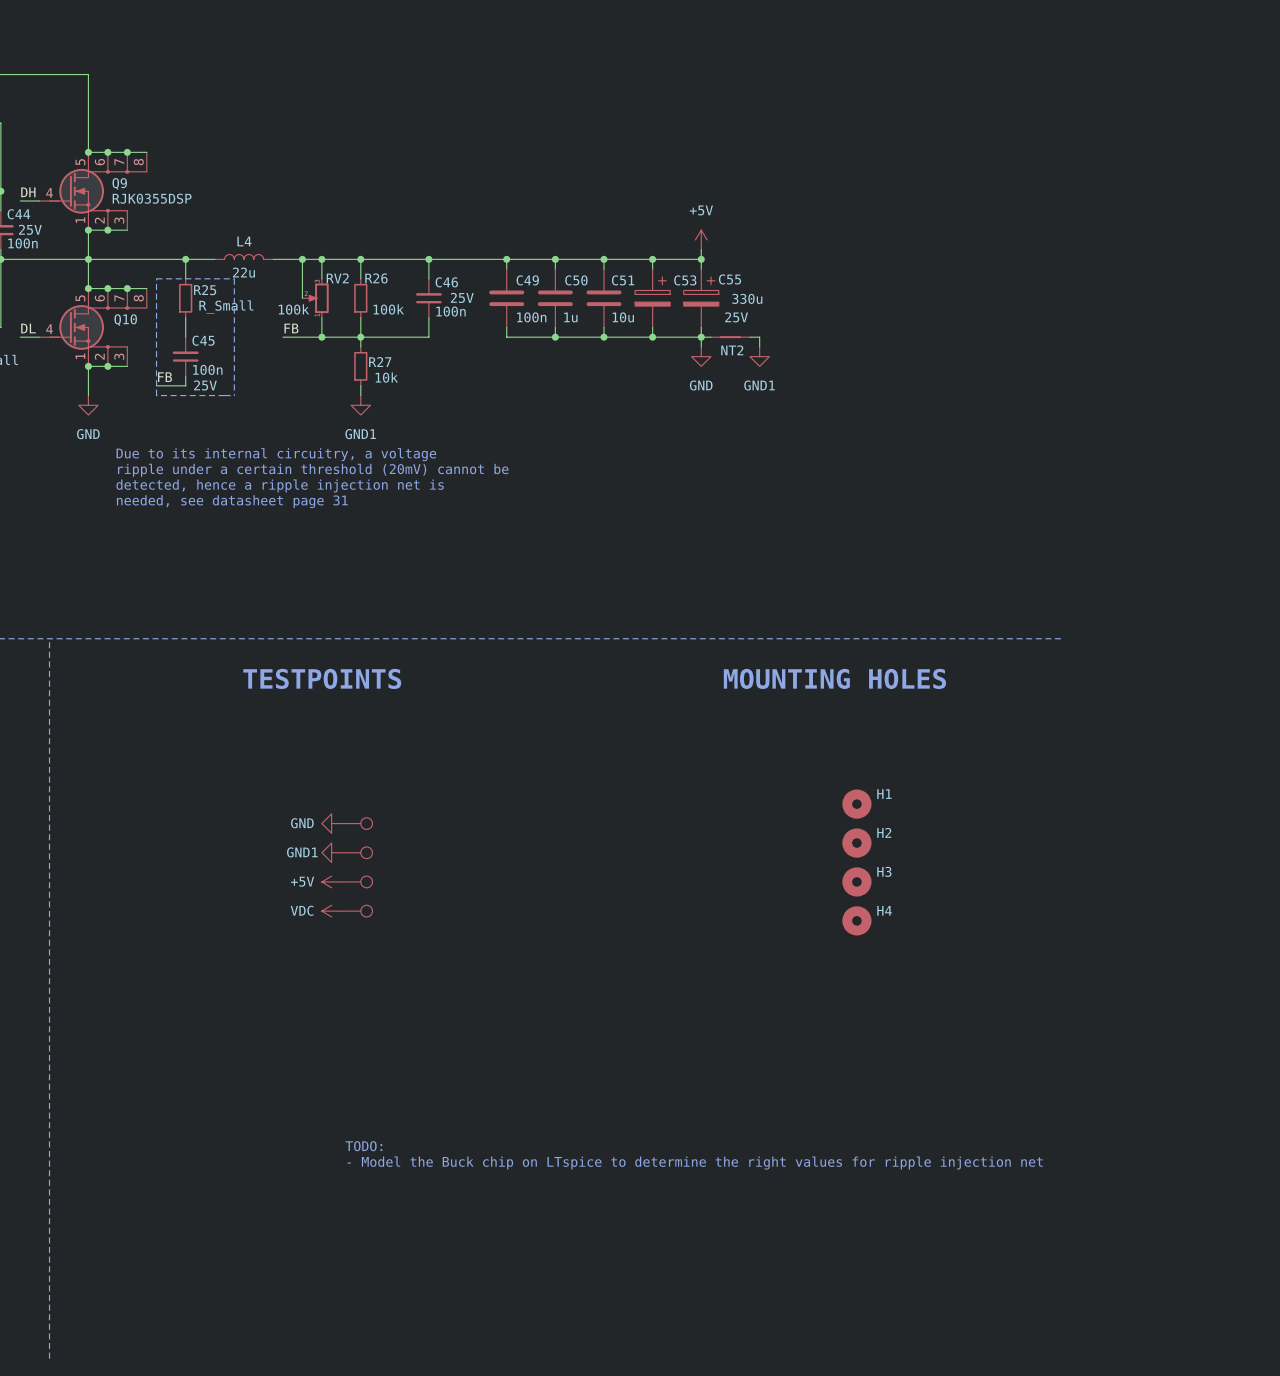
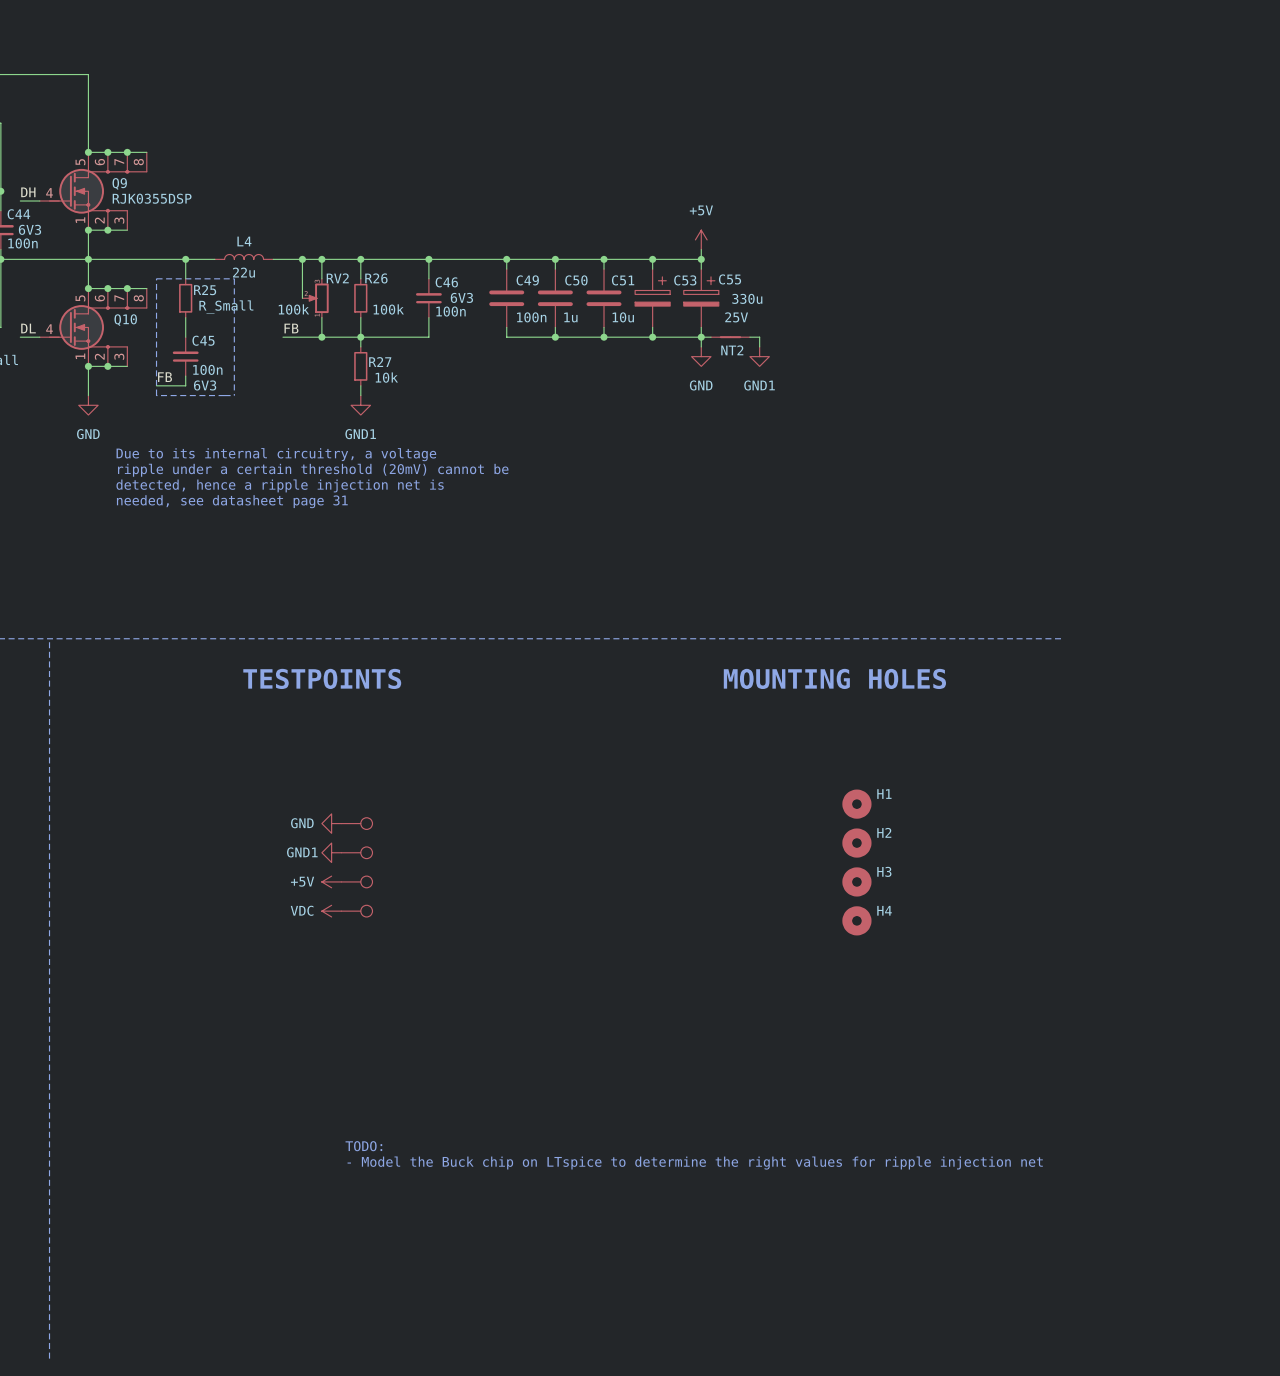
C44 text: 25V (30, 229) -> 6V3 (29, 229)
C46 text: 25V (462, 297) -> 6V3 (461, 297)
C45 text: 25V (205, 385) -> 6V3 (205, 385)

